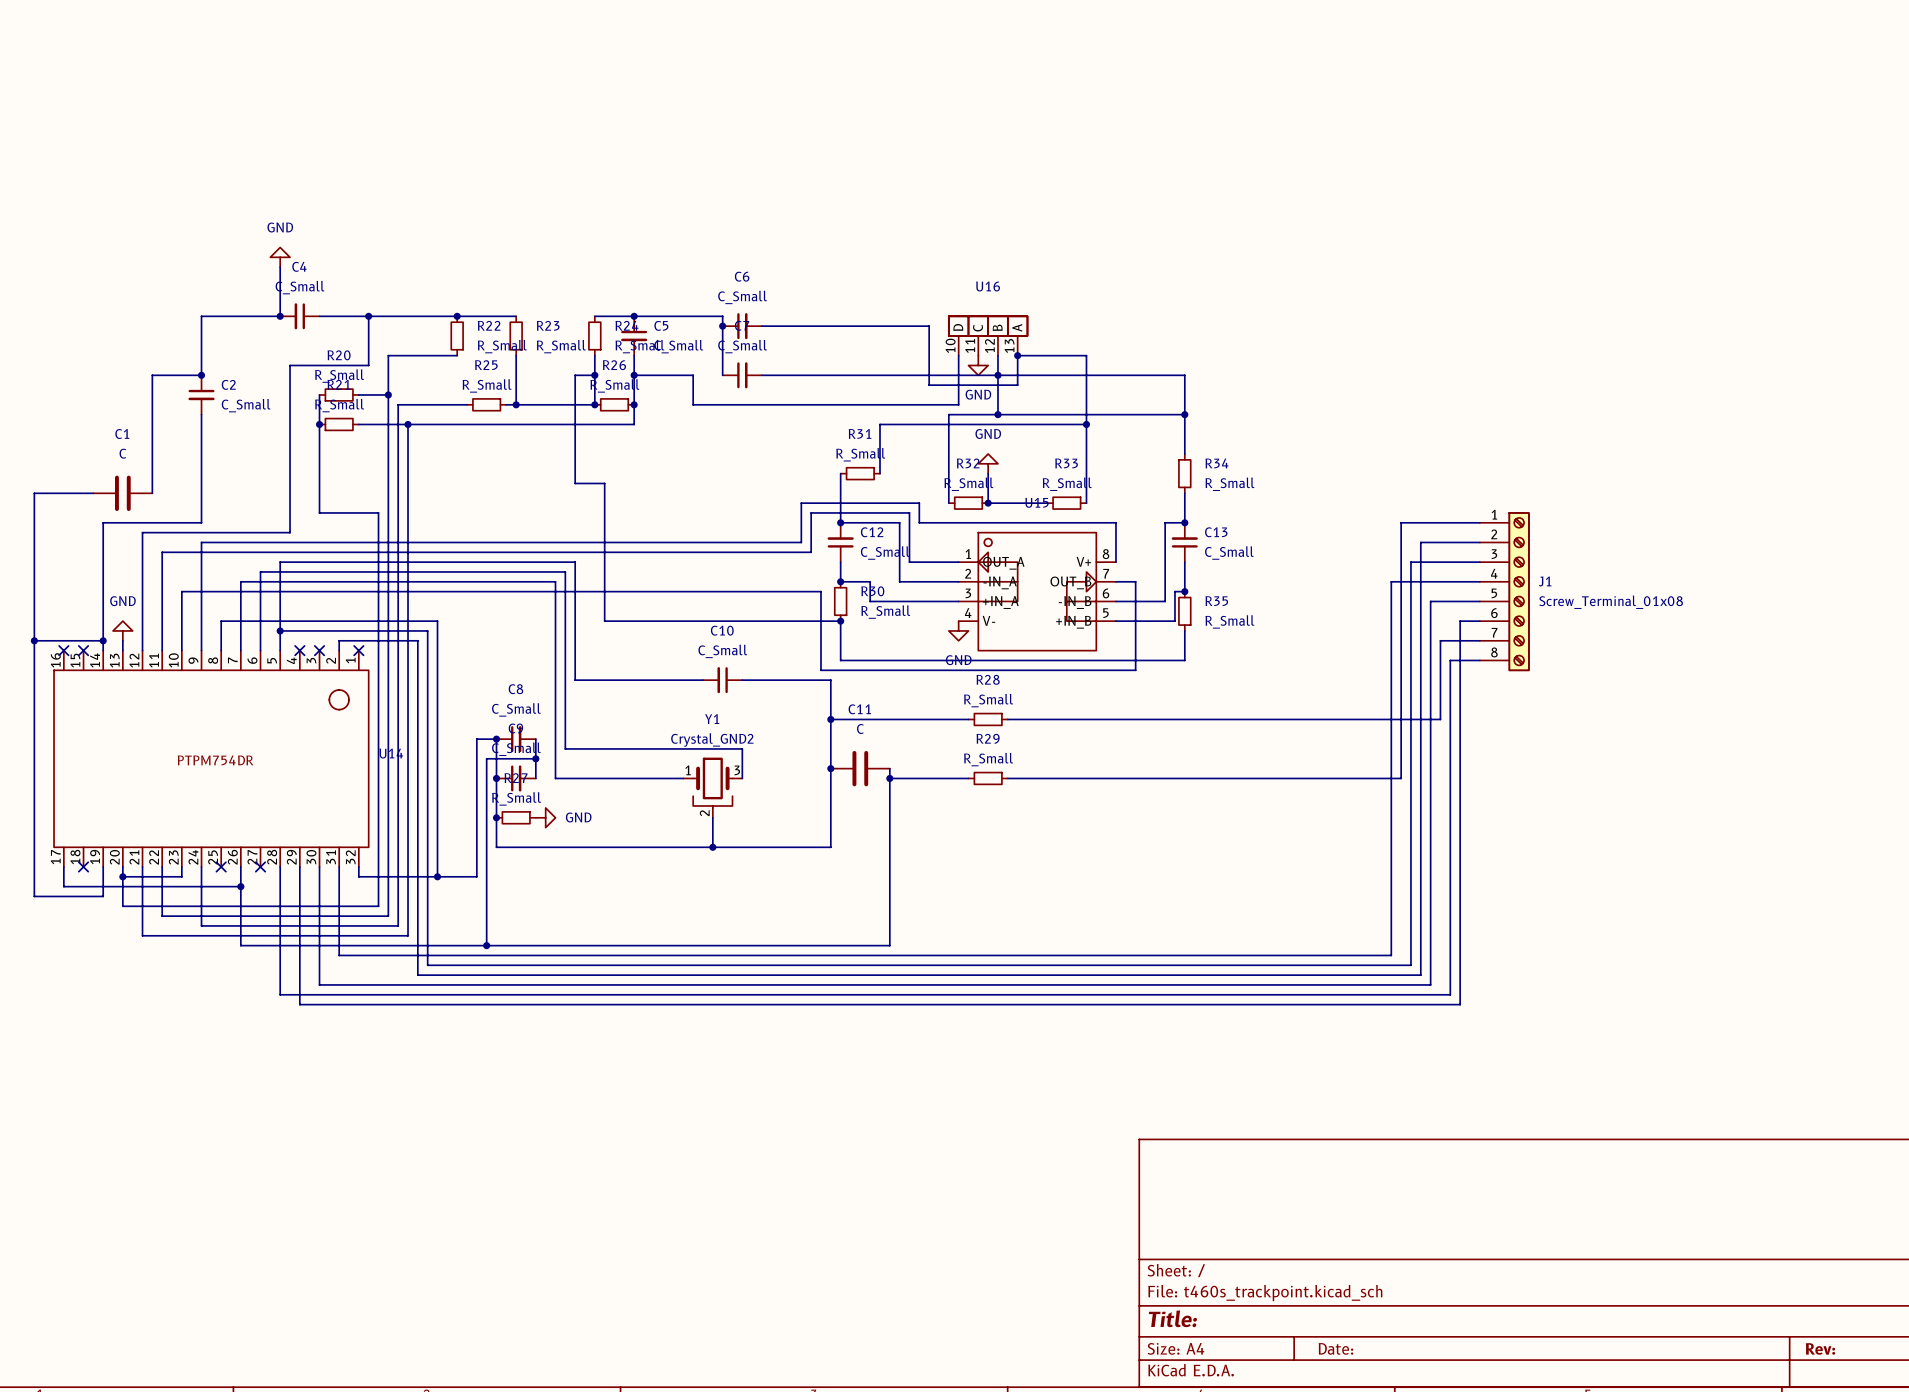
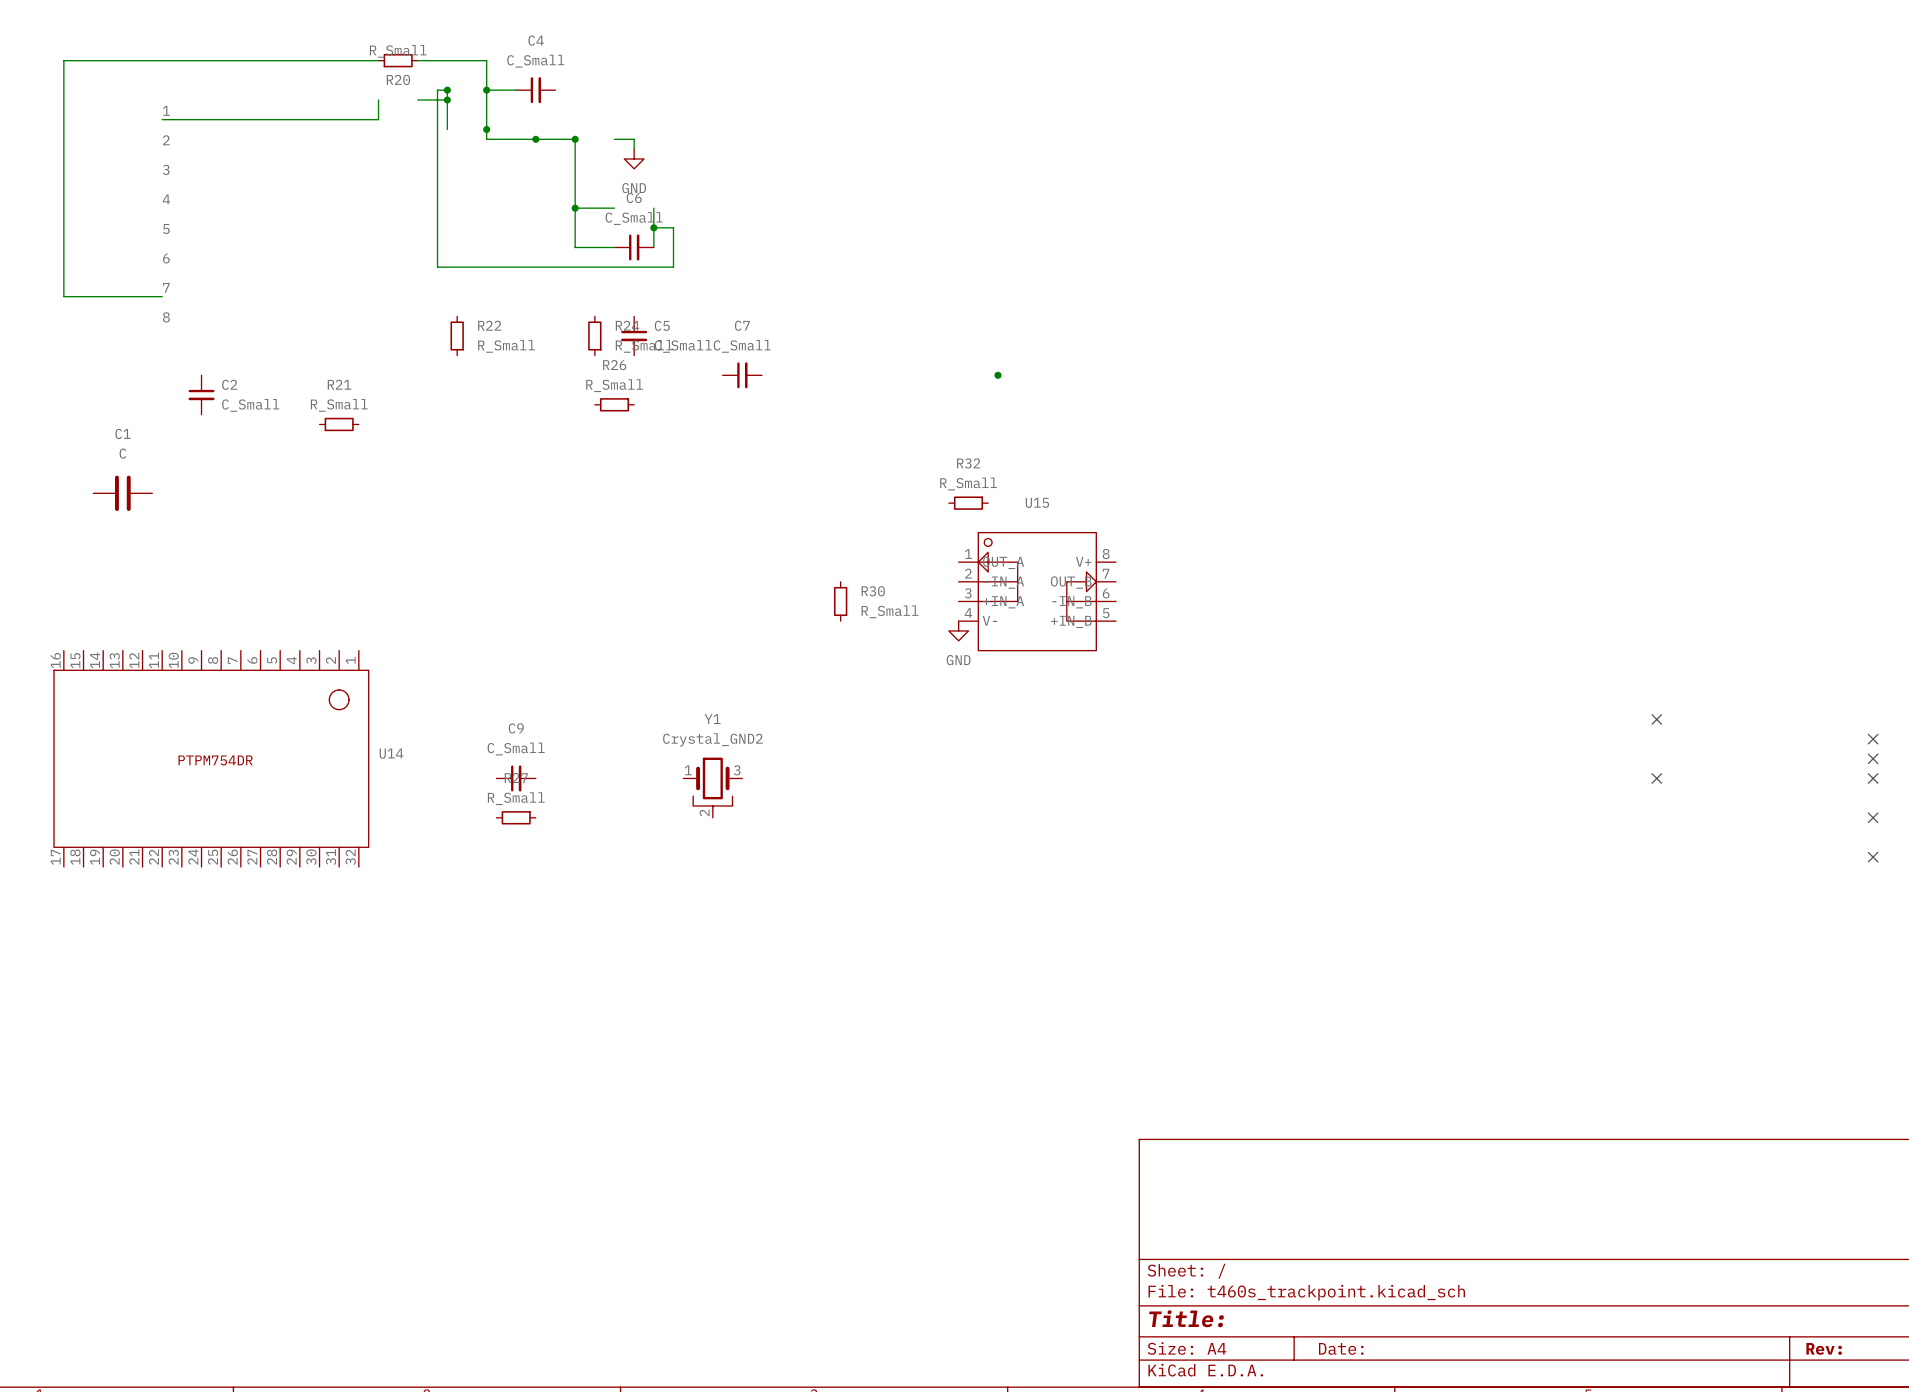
wire: none -> (378, 60) (63, 60) (63, 296) (162, 296)
wire: none -> (417, 60) (486, 60) (486, 139) (575, 139) (575, 247) (614, 247)
junction: none -> (447, 90)
wire: none -> (486, 90) (516, 90)
junction: none -> (486, 90)
wire: none -> (378, 99) (378, 119) (162, 119)
wire: none -> (417, 99) (447, 99)
junction: none -> (447, 99)
label: none -> 1 (166, 110)
wire: none -> (447, 129) (447, 90) (437, 90) (437, 267) (673, 267) (673, 227) (653, 227)
junction: none -> (486, 129)
junction: none -> (535, 139)
junction: none -> (575, 139)
wire: none -> (614, 139) (634, 139) (634, 149)
label: none -> 2 (166, 140)
power symbol: none -> GND (634, 158)
label: none -> 3 (166, 169)
label: none -> 4 (166, 199)
wire: none -> (575, 208) (614, 208)
junction: none -> (575, 208)
wire: none -> (653, 208) (653, 247)
junction: none -> (653, 227)
label: none -> 5 (166, 228)
power symbol: GND (280, 257) -> none
label: none -> 6 (166, 258)
wire: (280, 267) (280, 316) (201, 316) (201, 375) (152, 375) (152, 493) -> none
label: none -> 7 (166, 287)
junction: (280, 316) -> none
C4 rotation: 0° (299, 316) -> 180° (535, 90)
C4 position: (299, 316) -> (535, 90)
wire: (319, 316) (516, 316) -> none
wire: (368, 316) (368, 365) (290, 365) (290, 532) (142, 532) (142, 650) -> none
junction: (368, 316) -> none
junction: (457, 316) -> none
wire: (594, 316) (722, 316) (722, 375) -> none
junction: (634, 316) -> none
label: none -> 8 (166, 317)
junction: (722, 326) -> none
C6 position: (742, 326) -> (634, 247)
wire: (761, 326) (929, 326) (929, 385) (1017, 385) (1017, 355) (1086, 355) (1086, 503) -> none
R23: R_Small (516, 335) -> none
U16: (988, 335) -> none
R20 name position: R20 (339, 355) -> R20 (398, 79)
wire: (457, 355) (388, 355) (388, 916) (162, 916) (162, 866) -> none
wire: (516, 355) (516, 404) -> none
wire: (594, 355) (594, 404) (506, 404) -> none
wire: (634, 355) (634, 424) (358, 424) -> none
wire: (958, 355) (958, 404) (693, 404) (693, 375) (634, 375) -> none
wire: (997, 355) (997, 414) -> none
junction: (1017, 355) -> none
power symbol: GND (978, 365) -> none
junction: (201, 375) -> none
wire: (594, 375) (575, 375) (575, 483) (604, 483) (604, 621) (840, 621) (840, 660) (1184, 660) (1184, 630) -> none
junction: (594, 375) -> none
junction: (634, 375) -> none
wire: (761, 375) (1184, 375) (1184, 453) -> none
R20 value position: R_Small (339, 376) -> R_Small (398, 51)
wire: (319, 394) (319, 512) (378, 512) (378, 906) (122, 906) (122, 866) -> none
R20 position: (339, 394) -> (398, 60)
wire: (358, 394) (388, 394) -> none
junction: (388, 394) -> none
wire: (467, 404) (398, 404) (398, 925) (201, 925) (201, 866) -> none
R25: R_Small (486, 404) -> none
junction: (516, 404) -> none
junction: (594, 404) -> none
junction: (634, 404) -> none
wire: (201, 414) (201, 522) (103, 522) (103, 650) -> none
junction: (997, 414) -> none
wire: (1184, 414) (948, 414) (948, 503) -> none
junction: (1184, 414) -> none
junction: (319, 424) -> none
wire: (408, 424) (408, 935) (142, 935) (142, 866) -> none
junction: (408, 424) -> none
wire: (1086, 424) (879, 424) (879, 473) -> none
junction: (1086, 424) -> none
power symbol: GND (988, 463) -> none
wire: (840, 473) (840, 522) (899, 522) (899, 581) (958, 581) -> none
R31: R_Small (860, 473) -> none
wire: (988, 473) (988, 503) (1047, 503) -> none
R34: R_Small (1184, 473) -> none
wire: (93, 493) (34, 493) (34, 896) (103, 896) (103, 866) -> none
wire: (1184, 493) (1184, 522) (1165, 522) (1165, 601) (1115, 601) -> none
junction: (988, 503) -> none
R33: R_Small (1066, 503) -> none
junction: (840, 522) -> none
junction: (1184, 522) -> none
wire: (1479, 522) (1401, 522) (1401, 778) (1007, 778) -> none
C12: C_Small (840, 542) -> none
C13: C_Small (1184, 542) -> none
wire: (1479, 542) (1420, 542) (1420, 975) (417, 975) (417, 640) (339, 640) (339, 650) -> none
wire: (840, 562) (840, 581) (870, 581) (870, 601) (958, 601) -> none
wire: (958, 562) (909, 562) (909, 512) (811, 512) (811, 552) (162, 552) (162, 650) -> none
wire: (1115, 562) (1115, 522) (919, 522) (919, 503) (801, 503) (801, 542) (201, 542) (201, 650) -> none
wire: (1184, 562) (1184, 591) (1174, 591) (1174, 621) (1115, 621) -> none
wire: (1479, 562) (1410, 562) (1410, 965) (427, 965) (427, 630) (280, 630) -> none
junction: (840, 581) -> none
wire: (1115, 581) (1135, 581) (1135, 670) (820, 670) (820, 591) (181, 591) (181, 650) -> none
wire: (1479, 581) (1391, 581) (1391, 955) (339, 955) (339, 866) -> none
junction: (1184, 591) -> none
J1: Screw_Terminal_01x08 (1504, 591) -> none
wire: (1479, 601) (1430, 601) (1430, 984) (319, 984) (319, 866) -> none
R35: R_Small (1184, 611) -> none
junction: (840, 621) -> none
wire: (1479, 621) (1460, 621) (1460, 1004) (299, 1004) (299, 866) -> none
power symbol: GND (122, 630) -> none
junction: (280, 630) -> none
wire: (34, 640) (103, 640) -> none
junction: (34, 640) -> none
junction: (103, 640) -> none
wire: (122, 640) (122, 650) -> none
wire: (1479, 640) (1440, 640) (1440, 719) (1007, 719) -> none
no-connect mark: (63, 650) -> none
no-connect mark: (83, 650) -> none
wire: (221, 650) (221, 621) (437, 621) (437, 876) -> none
wire: (240, 650) (240, 581) (555, 581) (555, 778) (683, 778) -> none
wire: (260, 650) (260, 571) (565, 571) (565, 748) (742, 748) (742, 778) -> none
wire: (280, 650) (280, 562) (575, 562) (575, 680) (703, 680) -> none
no-connect mark: (299, 650) -> none
no-connect mark: (319, 650) -> none
no-connect mark: (358, 650) -> none
wire: (1479, 660) (1450, 660) (1450, 994) (280, 994) (280, 866) -> none
C10: C_Small (722, 680) -> none
wire: (742, 680) (830, 680) (830, 847) (496, 847) (496, 739) (476, 739) (476, 876) (358, 876) (358, 866) -> none
wire: (830, 719) (968, 719) -> none
junction: (830, 719) -> none
R28: R_Small (988, 719) -> none
no-connect mark: none -> (1656, 719)
junction: (496, 739) -> none
C8: C_Small (516, 739) -> none
wire: (535, 739) (535, 778) -> none
no-connect mark: none -> (1873, 739)
wire: (535, 758) (486, 758) (486, 945) -> none
junction: (535, 758) -> none
no-connect mark: none -> (1873, 758)
junction: (830, 768) -> none
C11: C (860, 768) -> none
wire: (889, 768) (889, 945) (240, 945) (240, 866) -> none
junction: (496, 778) -> none
wire: (889, 778) (968, 778) -> none
junction: (889, 778) -> none
R29: R_Small (988, 778) -> none
no-connect mark: none -> (1656, 778)
no-connect mark: none -> (1873, 778)
junction: (496, 817) -> none
power symbol: GND (545, 817) -> none
wire: (712, 817) (712, 847) -> none
no-connect mark: none -> (1873, 817)
junction: (712, 847) -> none
no-connect mark: none -> (1873, 857)
wire: (63, 866) (63, 886) (240, 886) -> none
no-connect mark: (83, 866) -> none
wire: (181, 866) (181, 876) (122, 876) -> none
no-connect mark: (221, 866) -> none
no-connect mark: (260, 866) -> none
junction: (122, 876) -> none
junction: (437, 876) -> none
junction: (240, 886) -> none
junction: (486, 945) -> none

